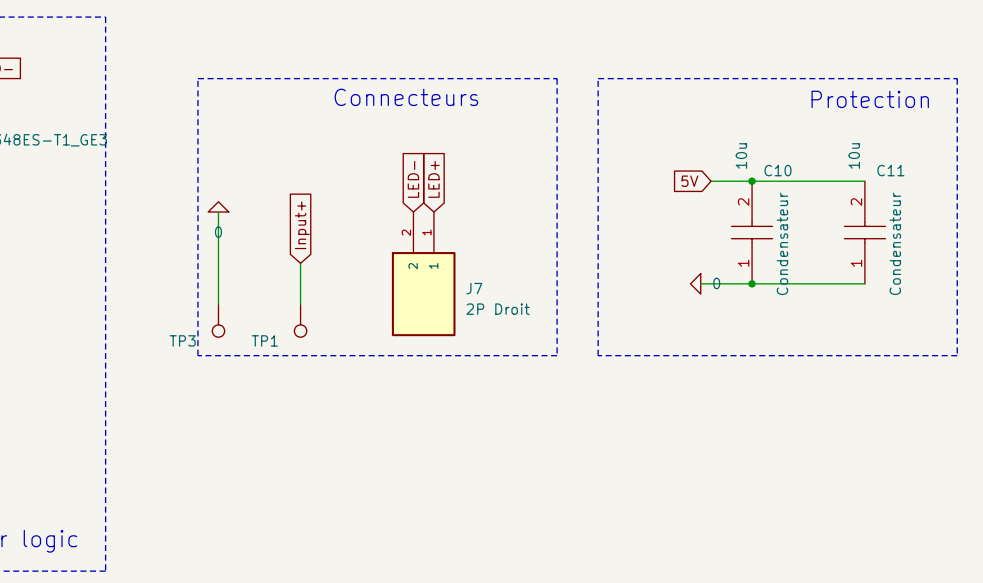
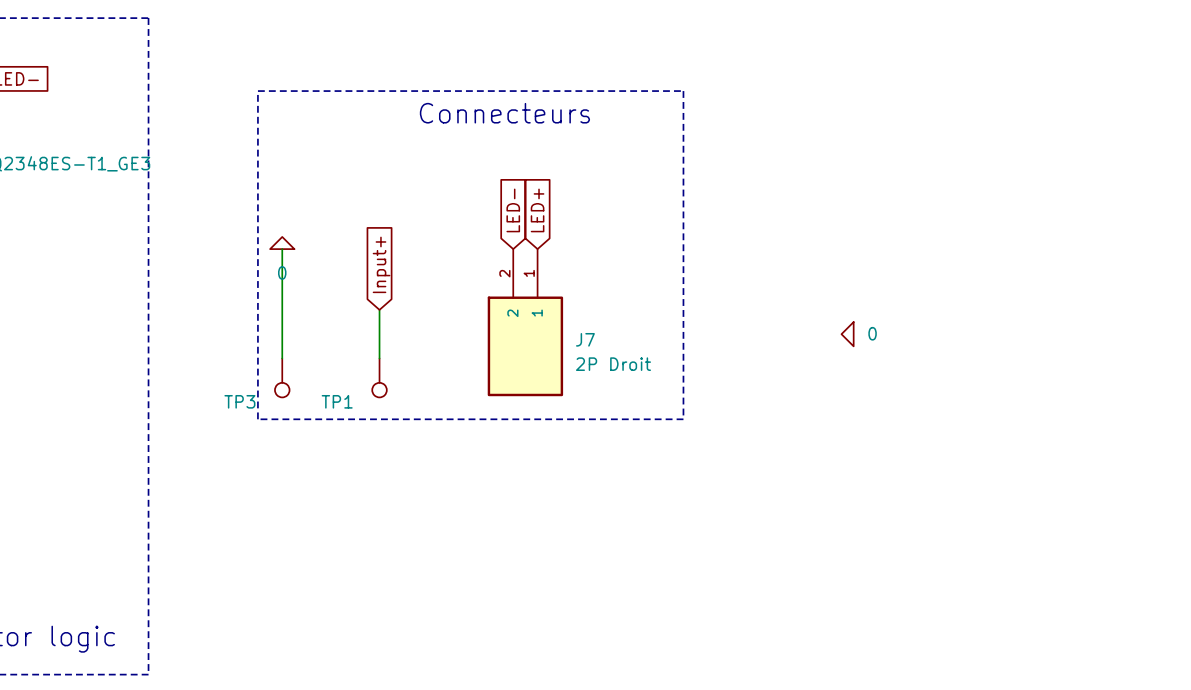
line: (598, 78) (957, 78) (957, 355) (598, 355) (598, 78) -> none
text: Protection (870, 99) -> none
global label: 5V (689, 181) -> none
wire: (711, 181) (864, 181) -> none
junction: (752, 181) -> none
C10: 10u (752, 232) -> none
C11: 10u (864, 232) -> none
wire: (700, 283) (864, 283) -> none
junction: (752, 283) -> none

